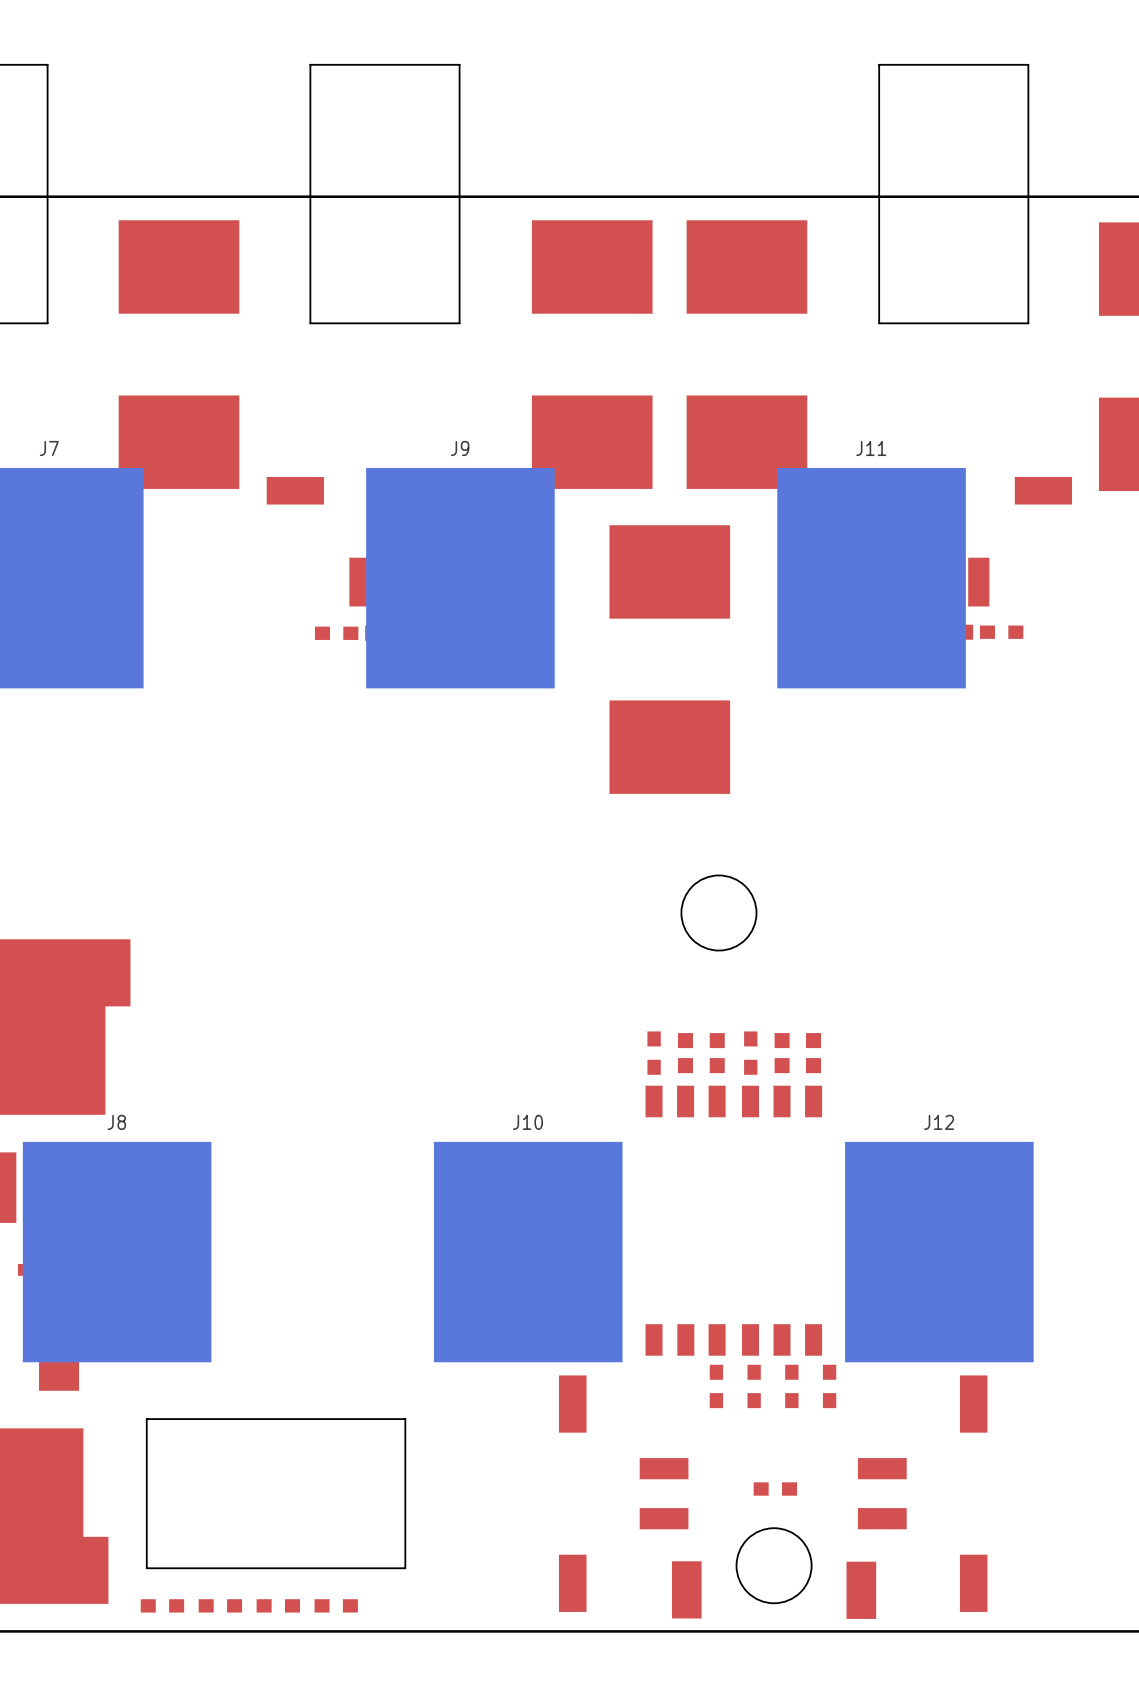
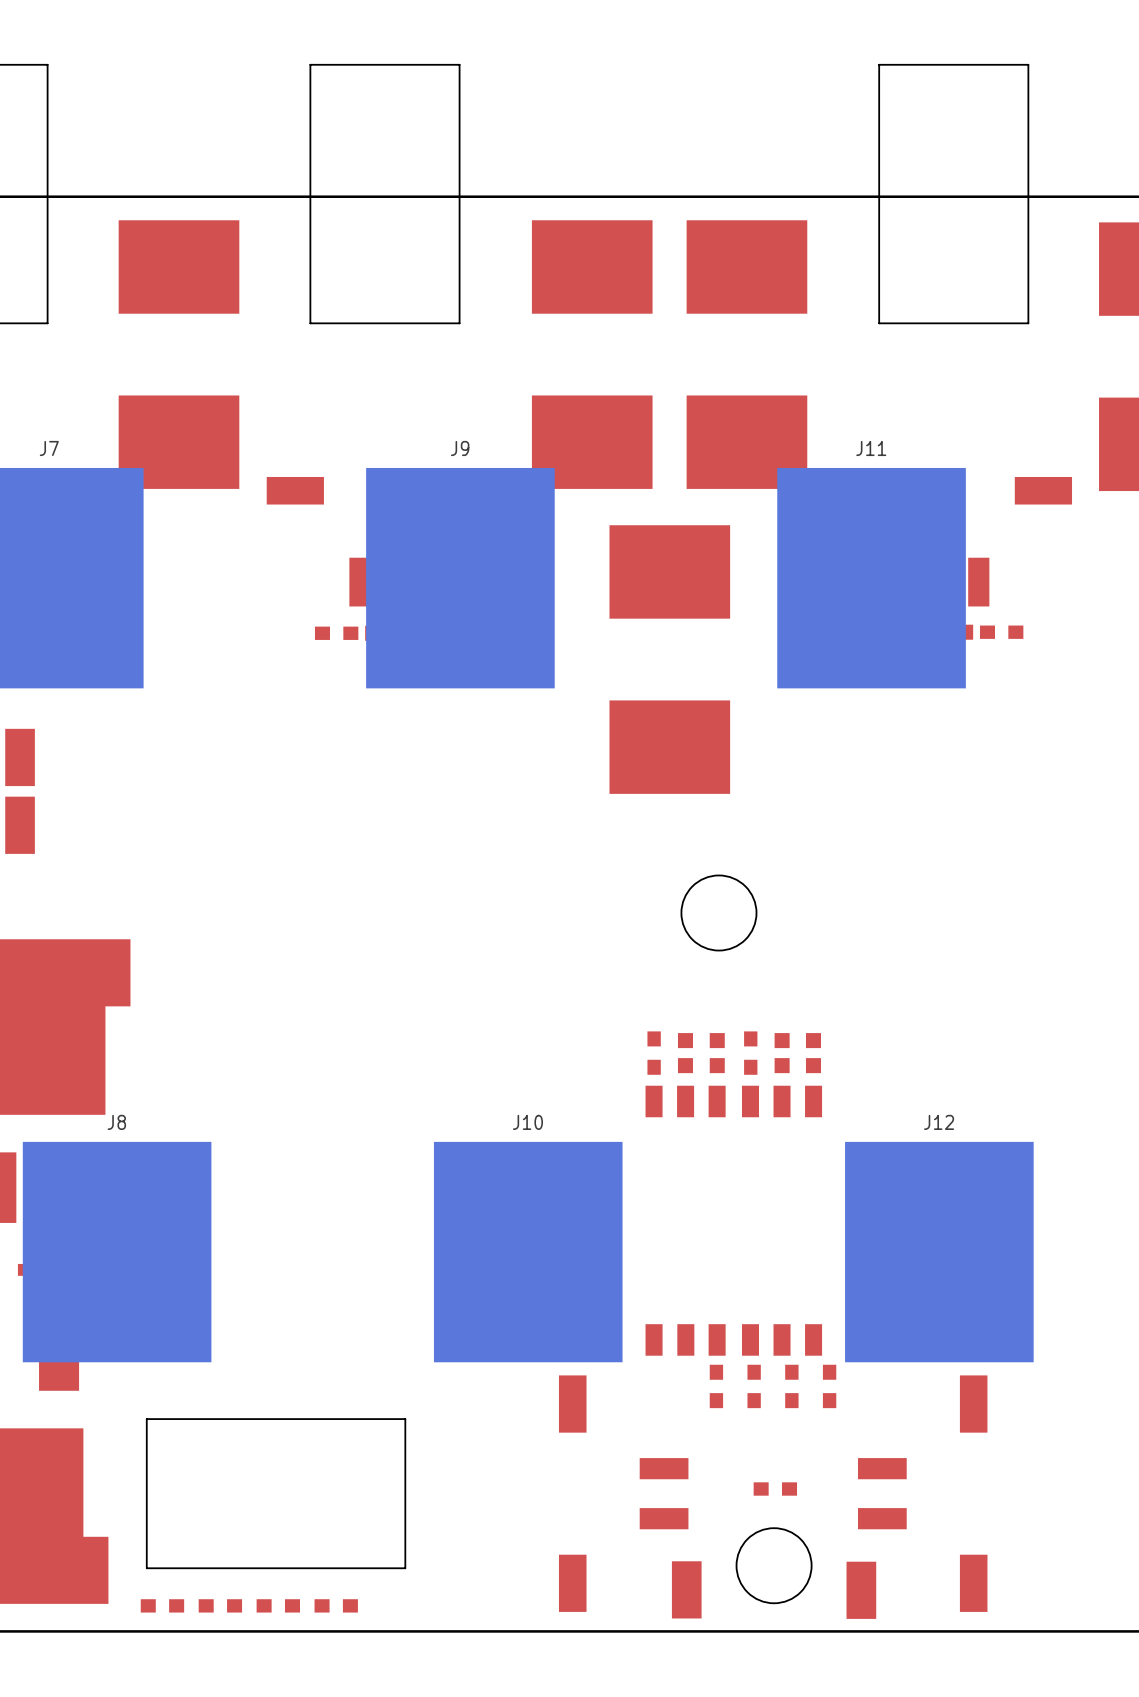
part: none -> (20, 757)
part: none -> (20, 825)

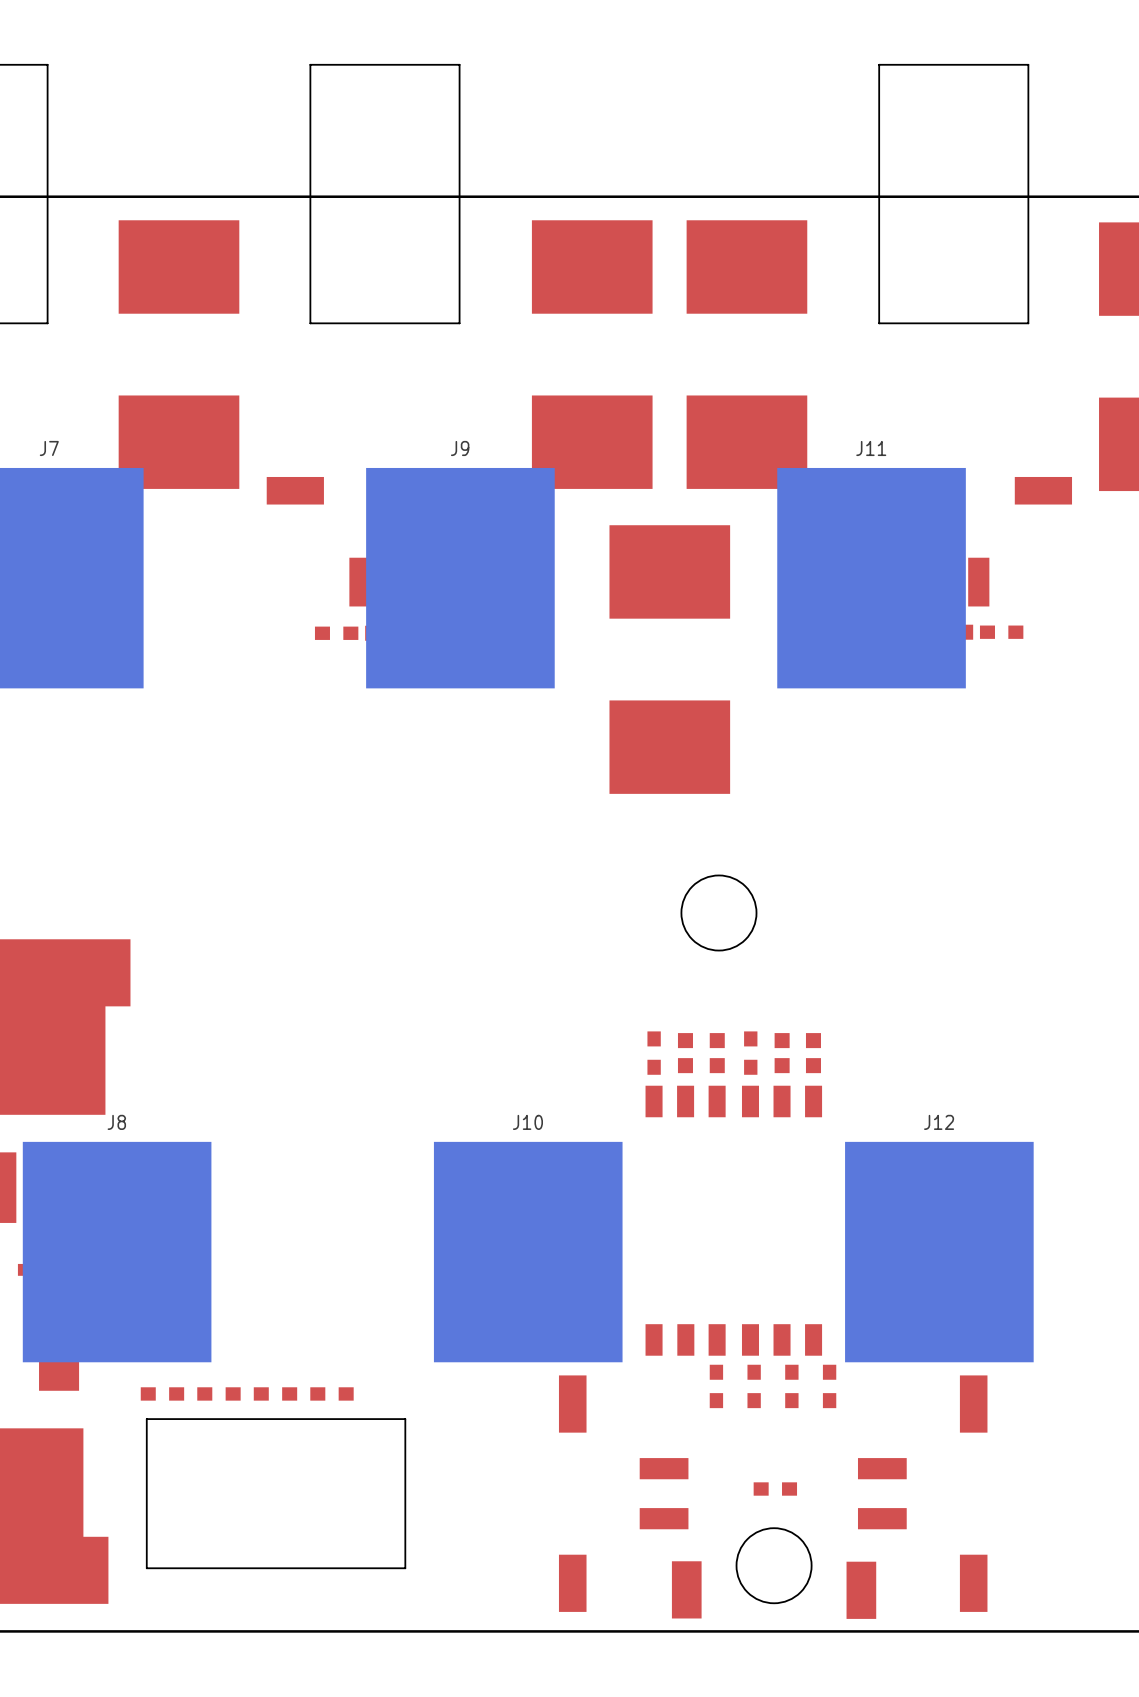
part: (20, 757) -> none
part: (20, 825) -> none
part: none -> (162, 1393)
part: none -> (218, 1393)
part: none -> (275, 1393)
part: none -> (331, 1393)
part: (162, 1605) -> none
part: (220, 1605) -> none
part: (278, 1605) -> none
part: (336, 1605) -> none

